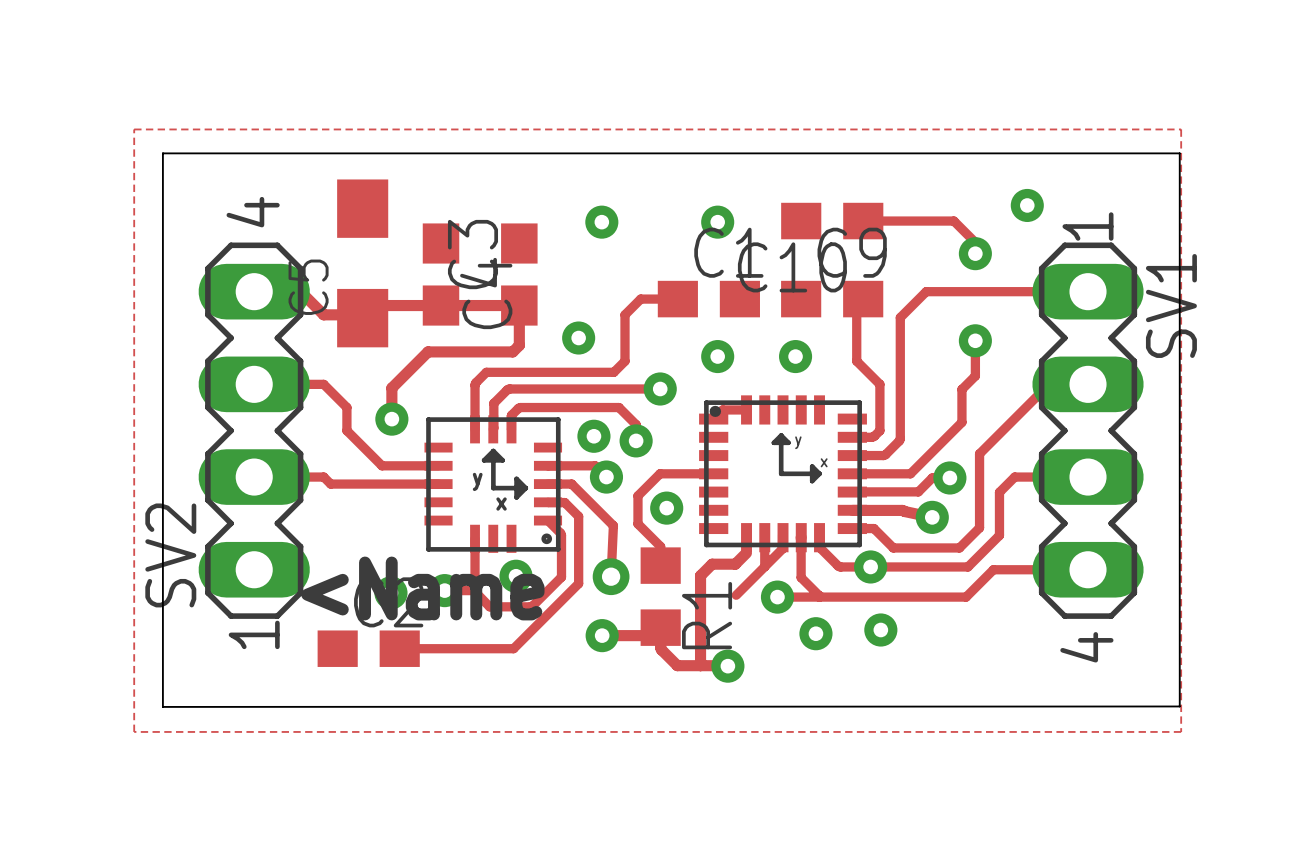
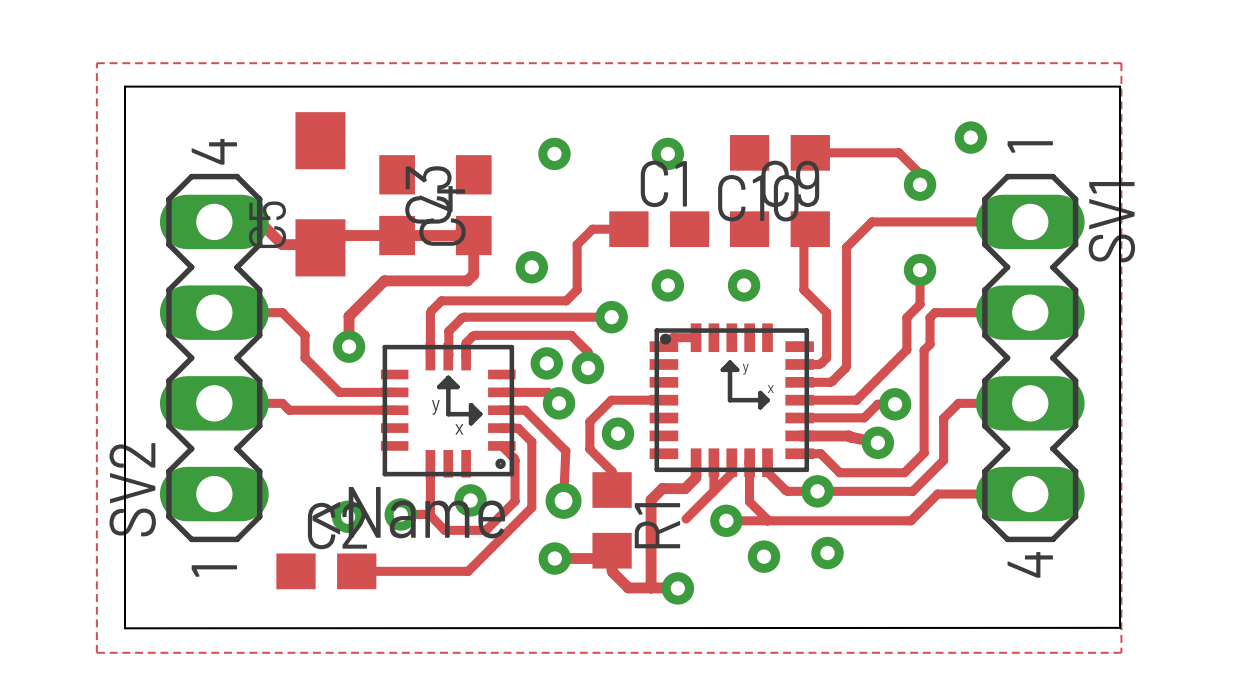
track: (1049, 384) (979, 453) -> (992, 312) (935, 312) (930, 317) (930, 344) (924, 350) (924, 380)

